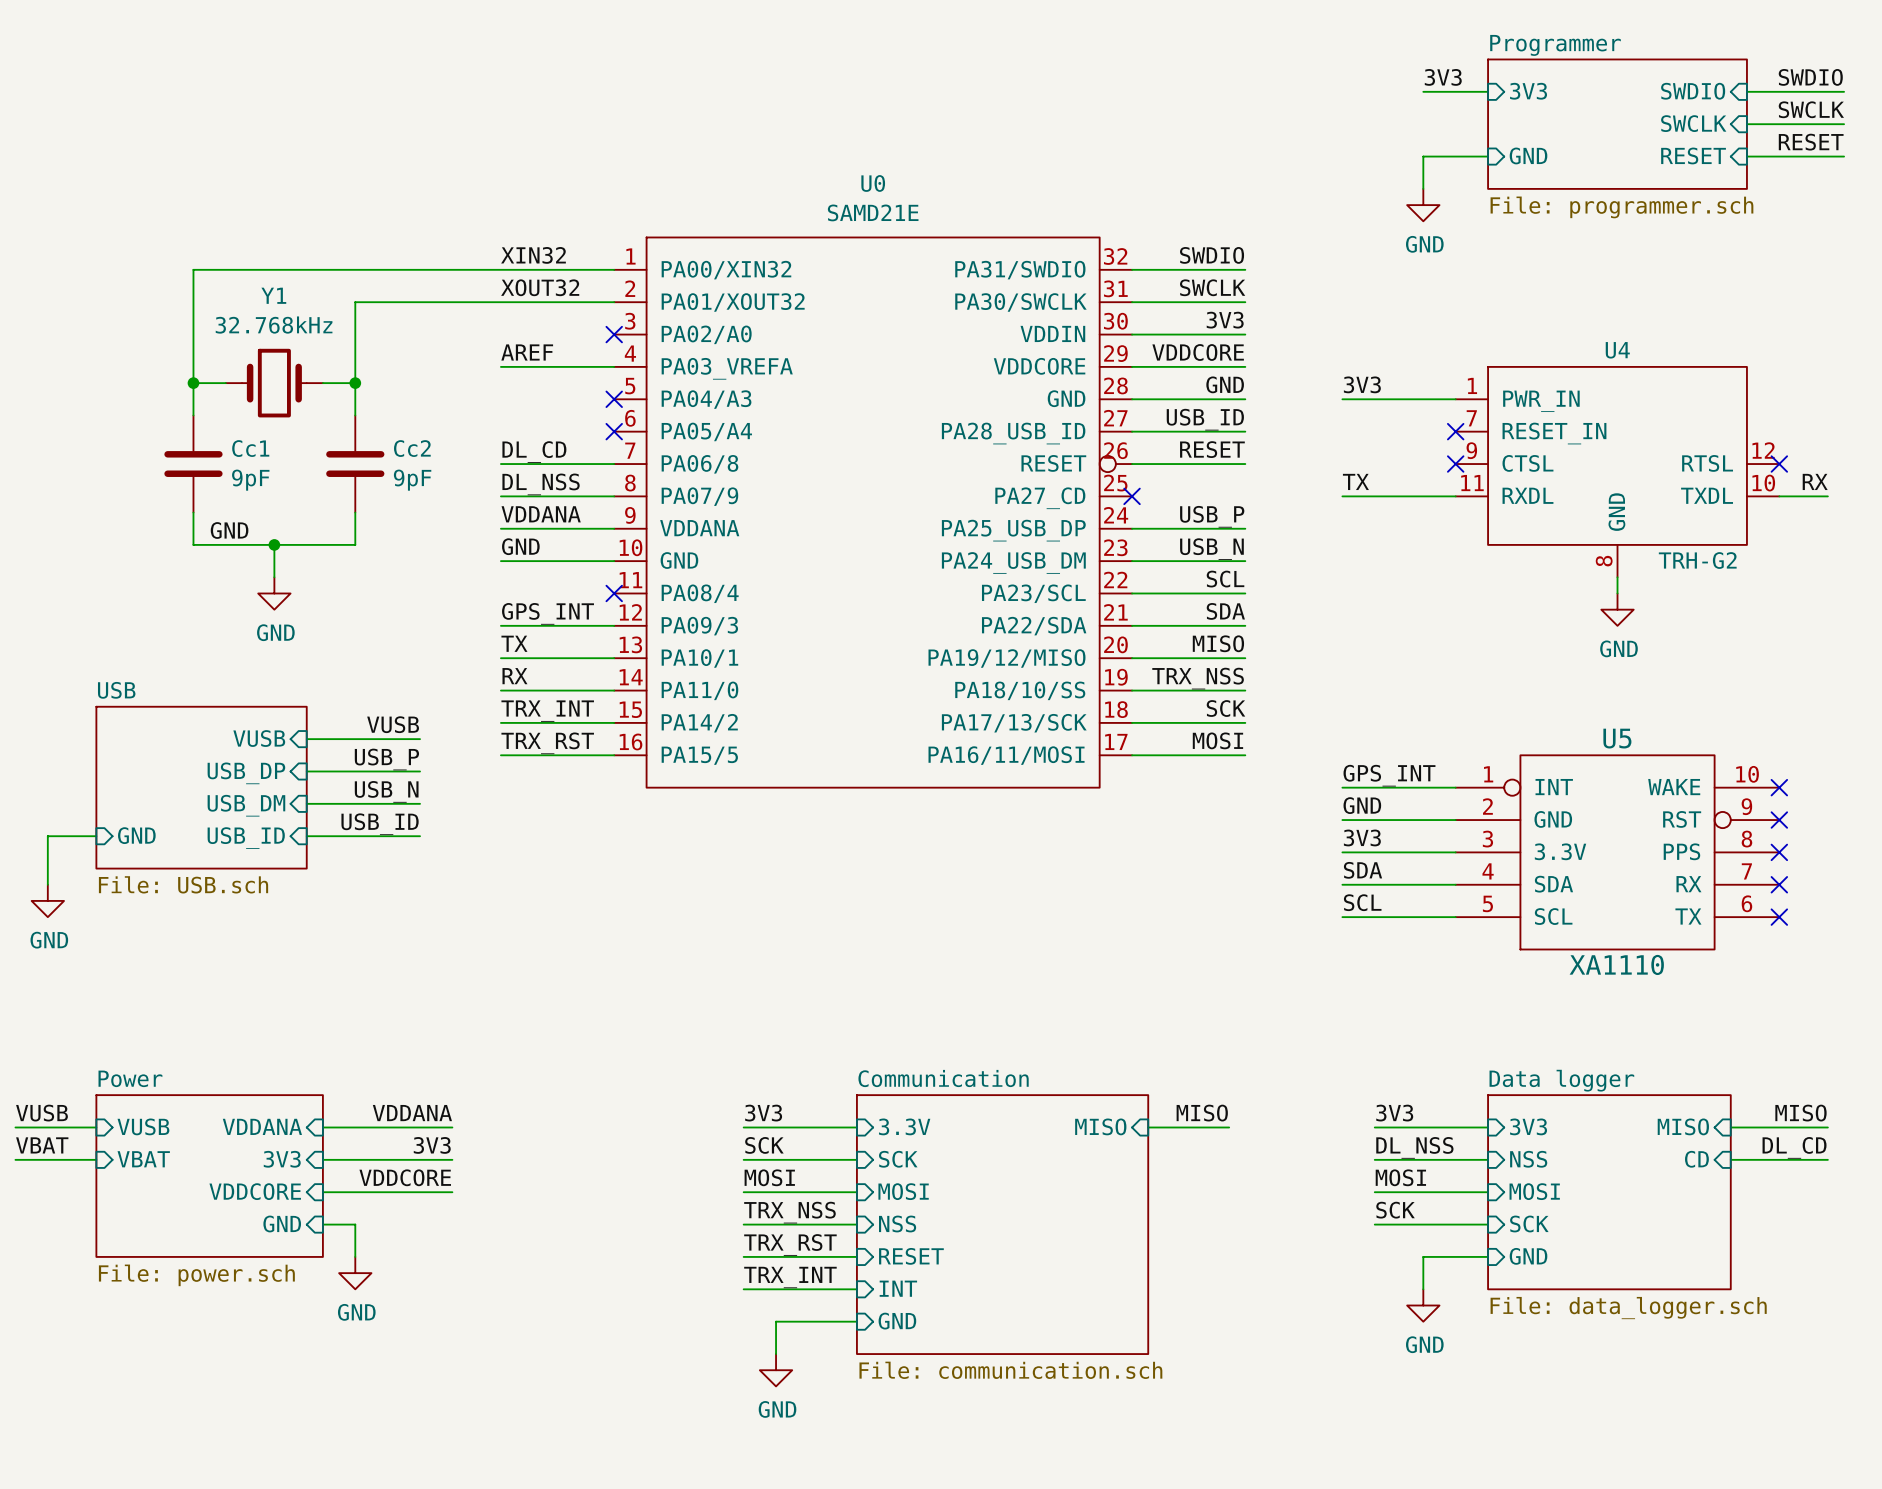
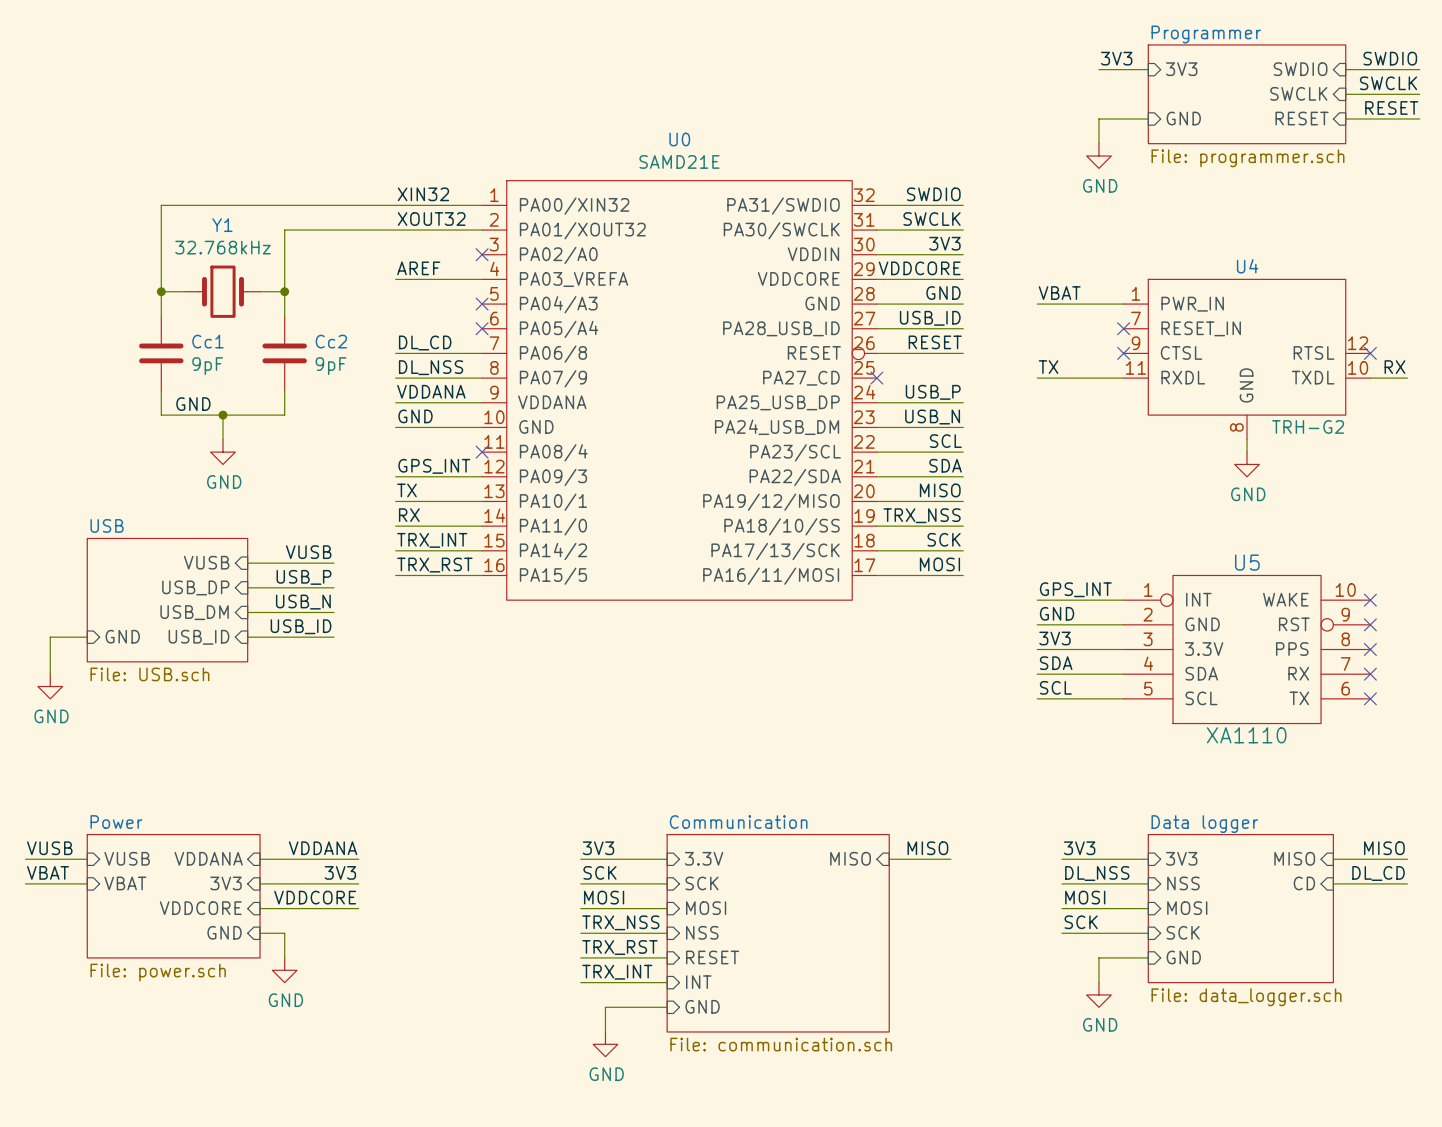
label: 3V3 (1362, 384) -> VBAT (1059, 293)

